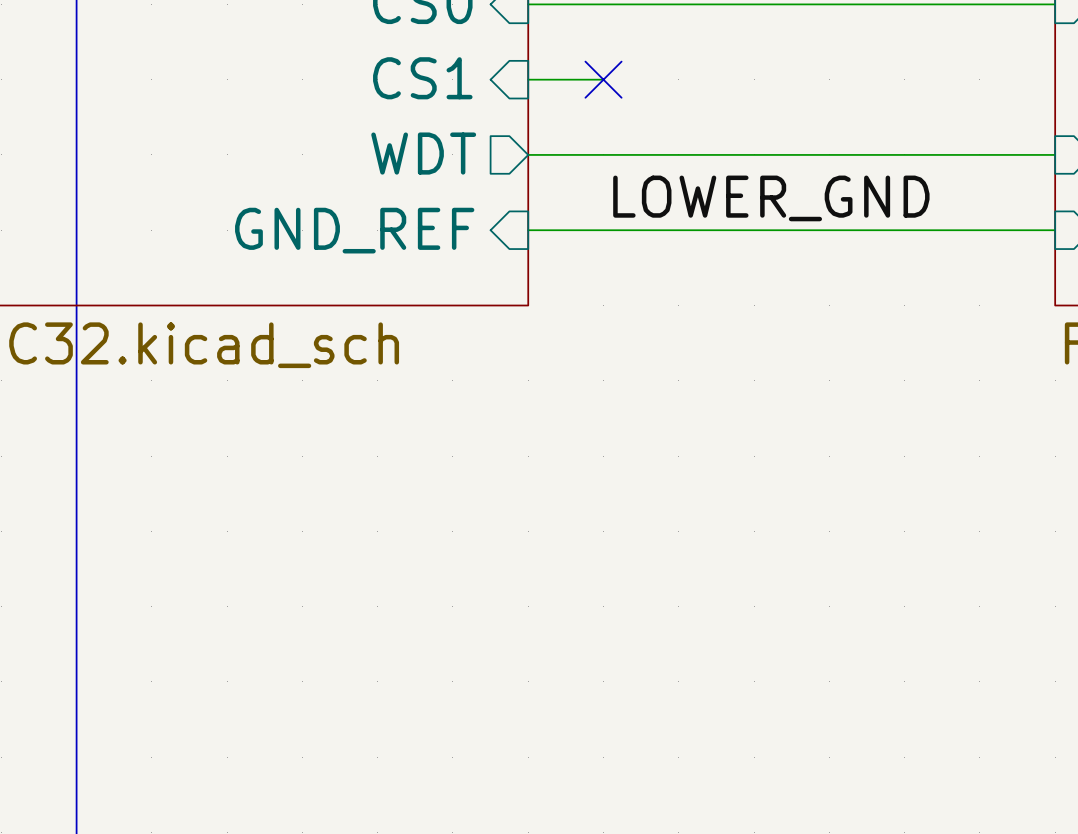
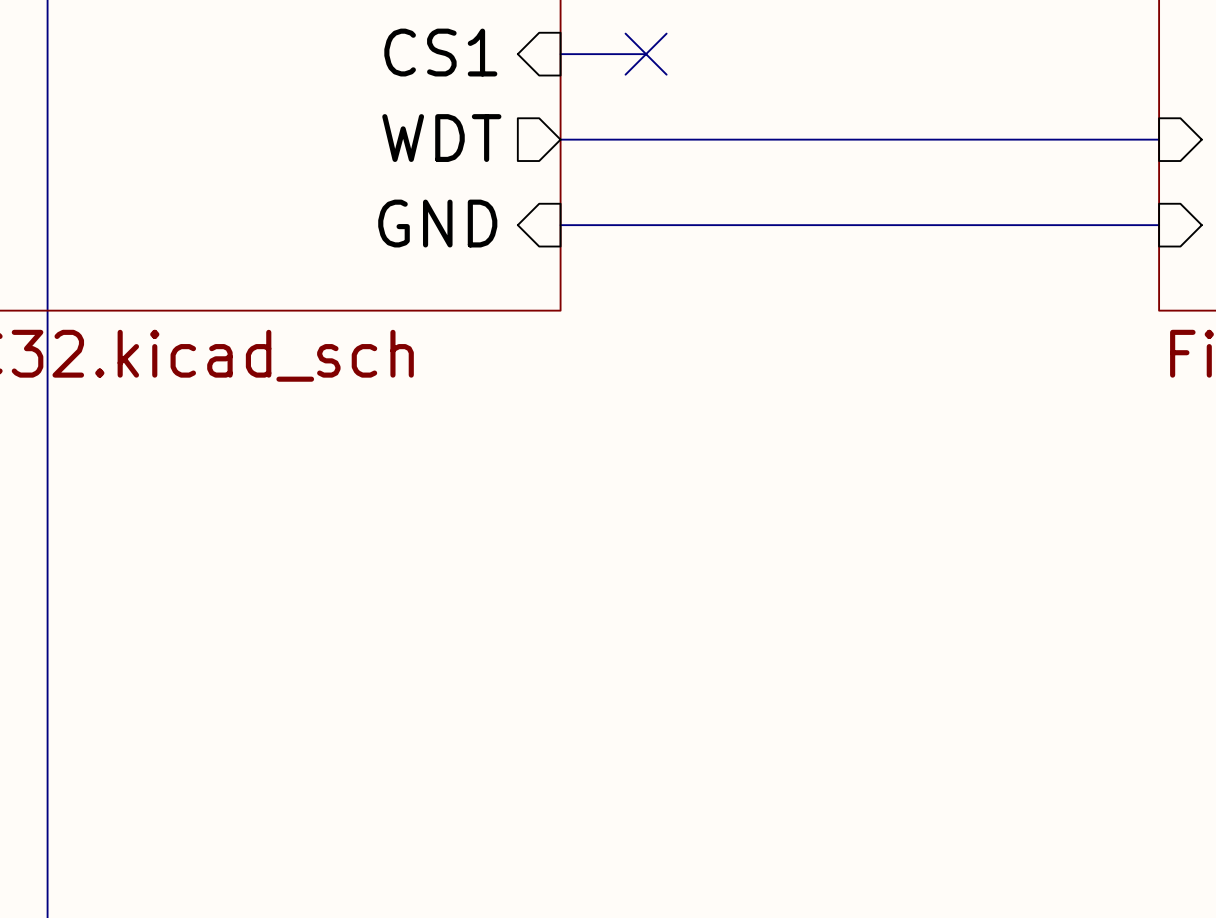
label: LOWER_GND (771, 198) -> none
sheet pin: GND_REF (354, 230) -> GND (437, 223)

